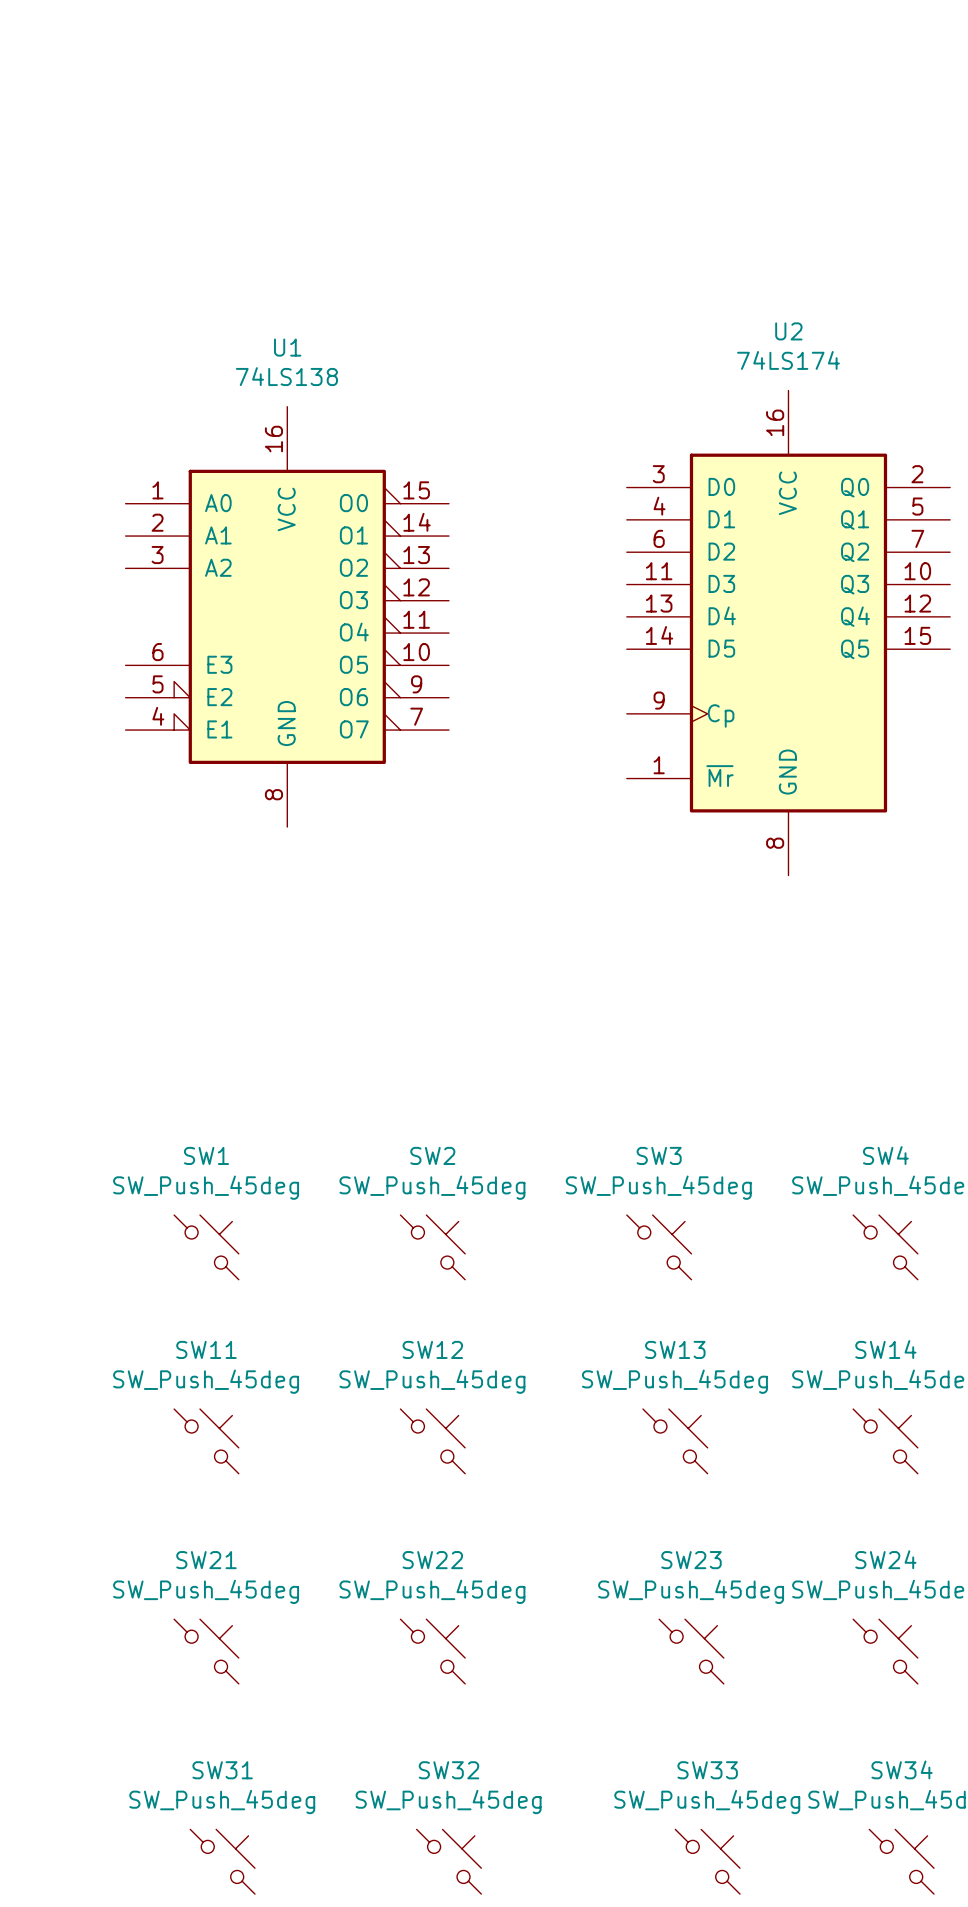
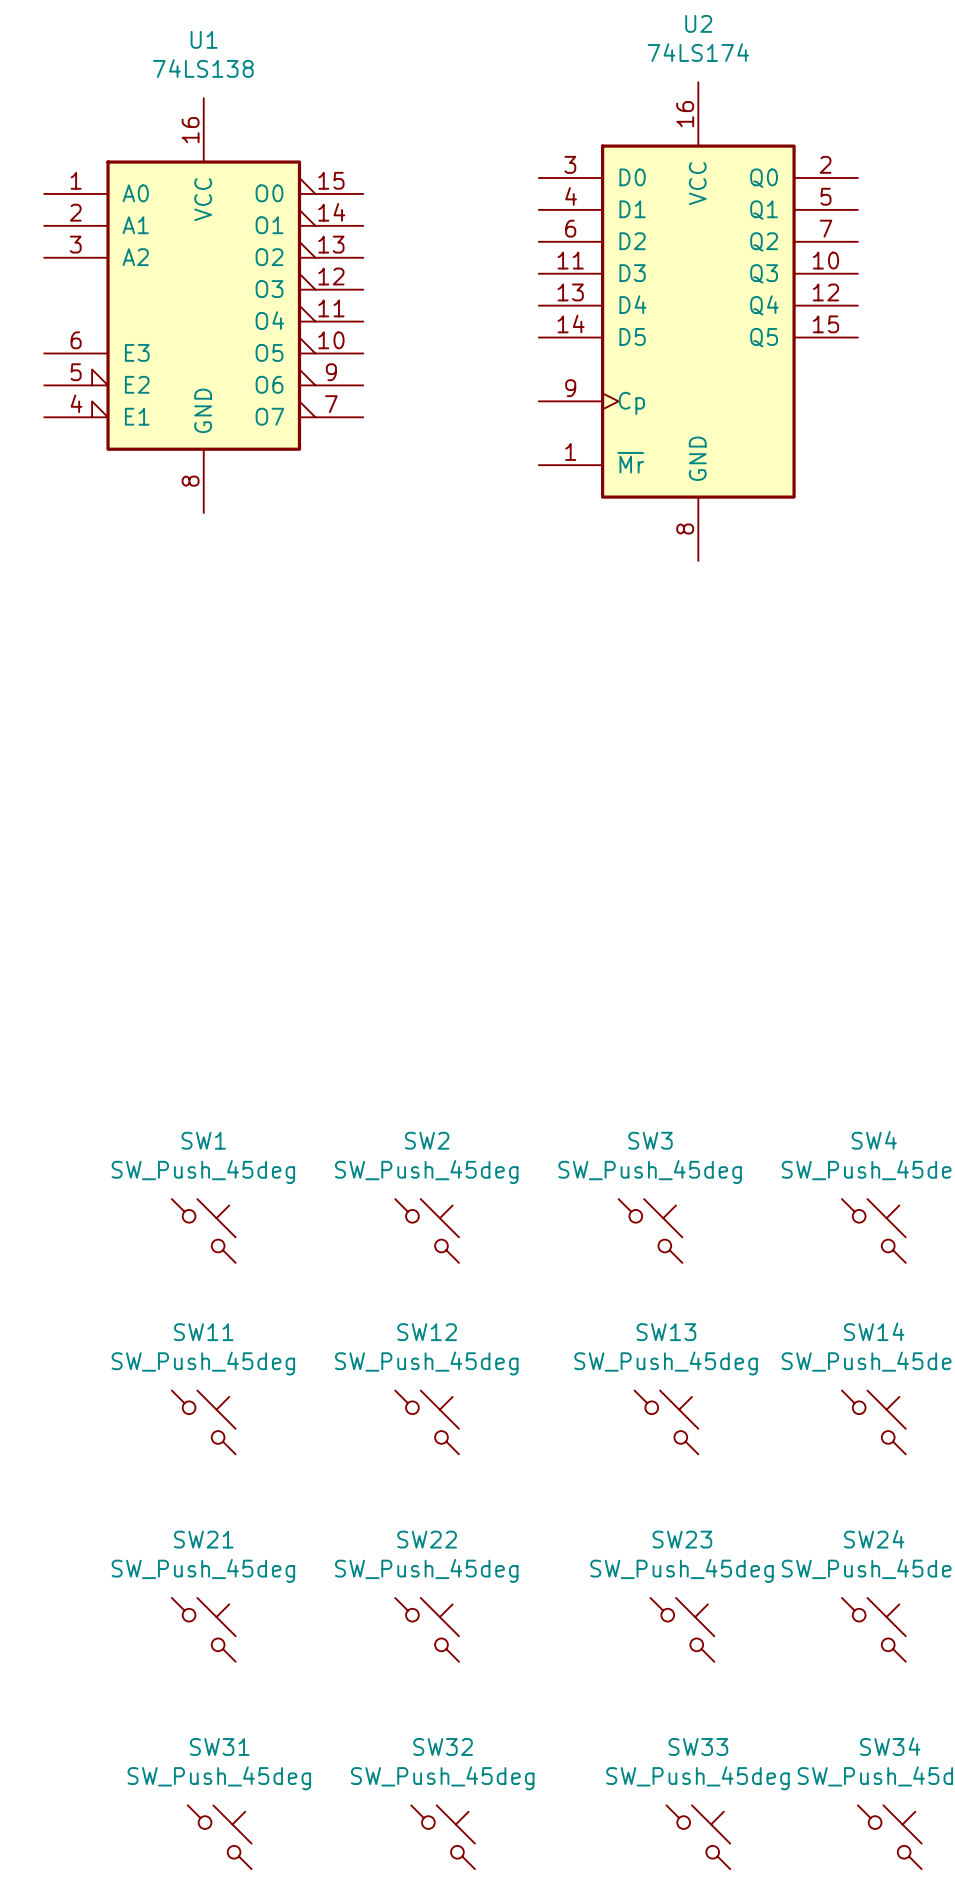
U1 position: (287, 616) -> (203, 305)
U2 position: (788, 633) -> (698, 321)

